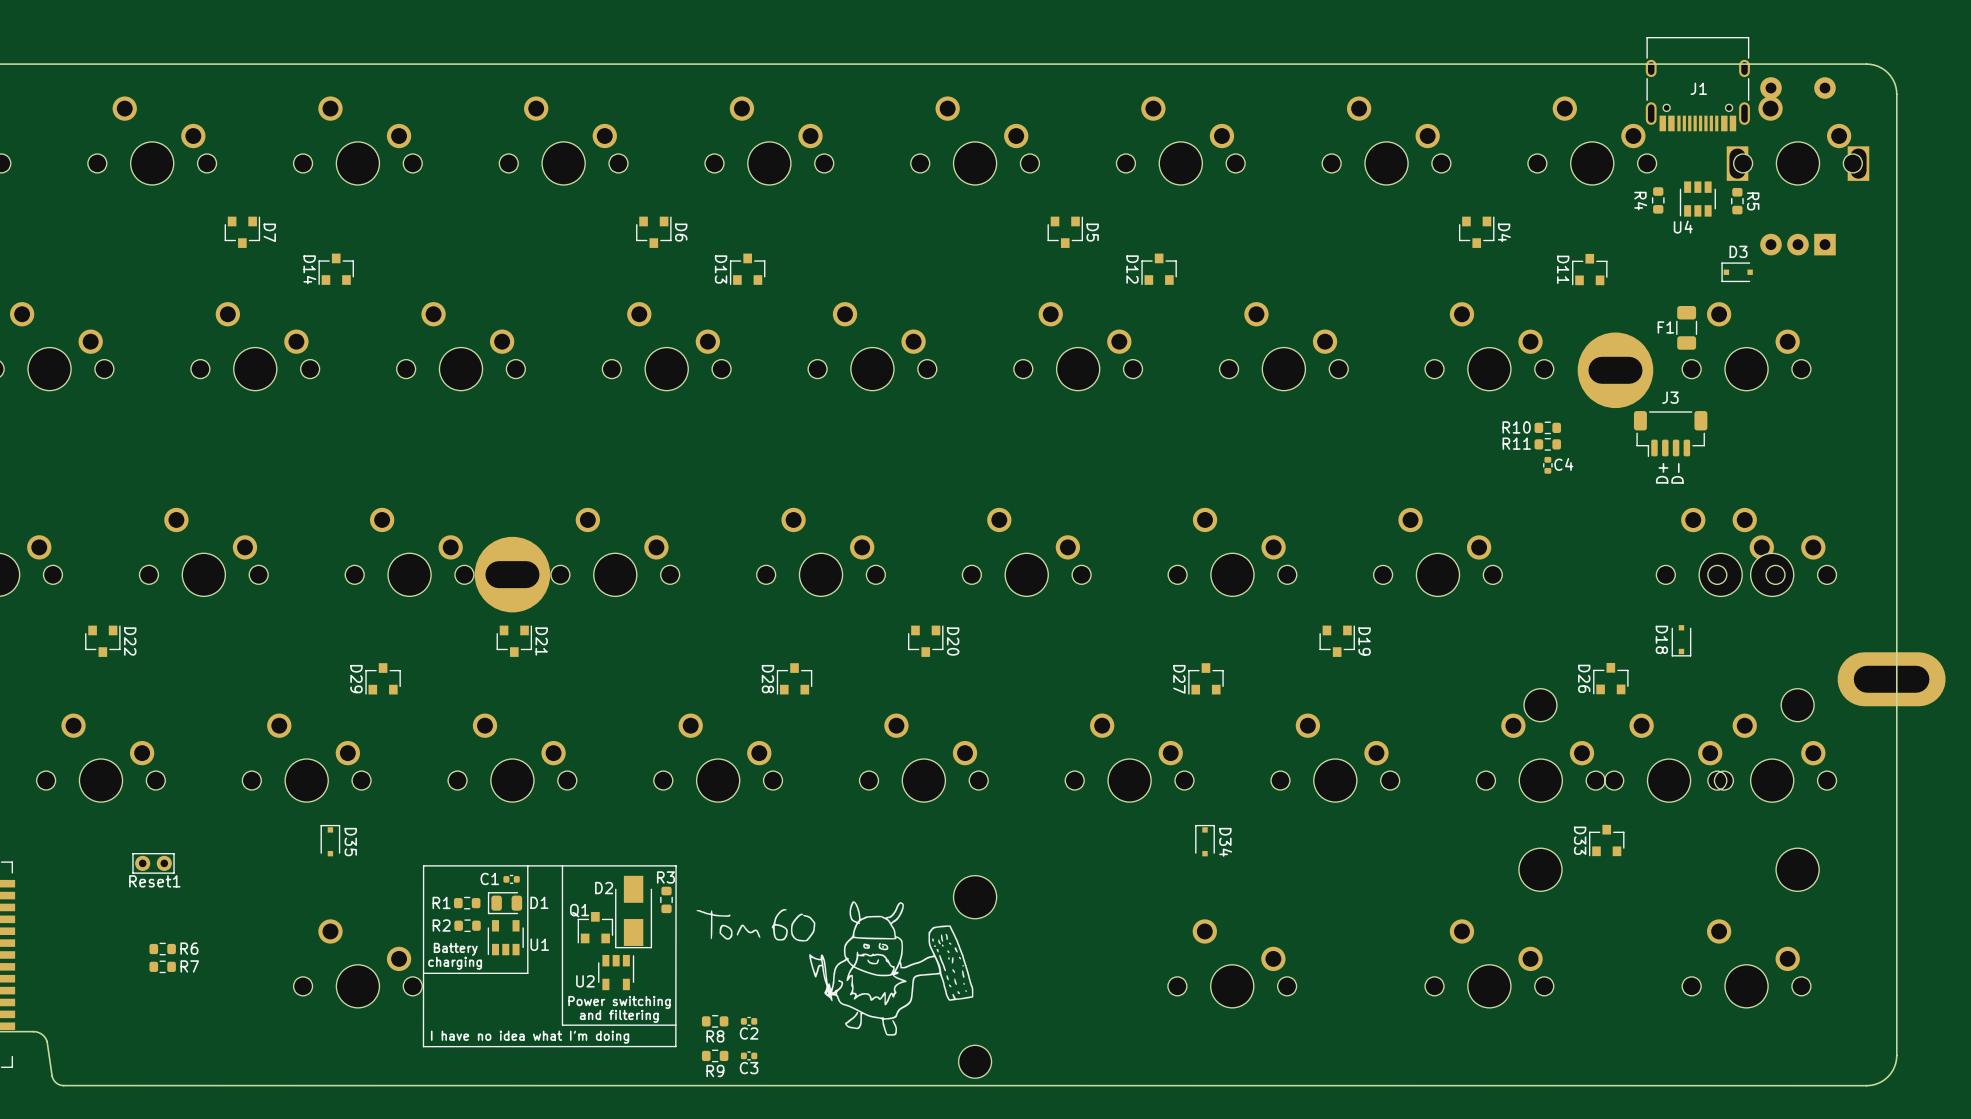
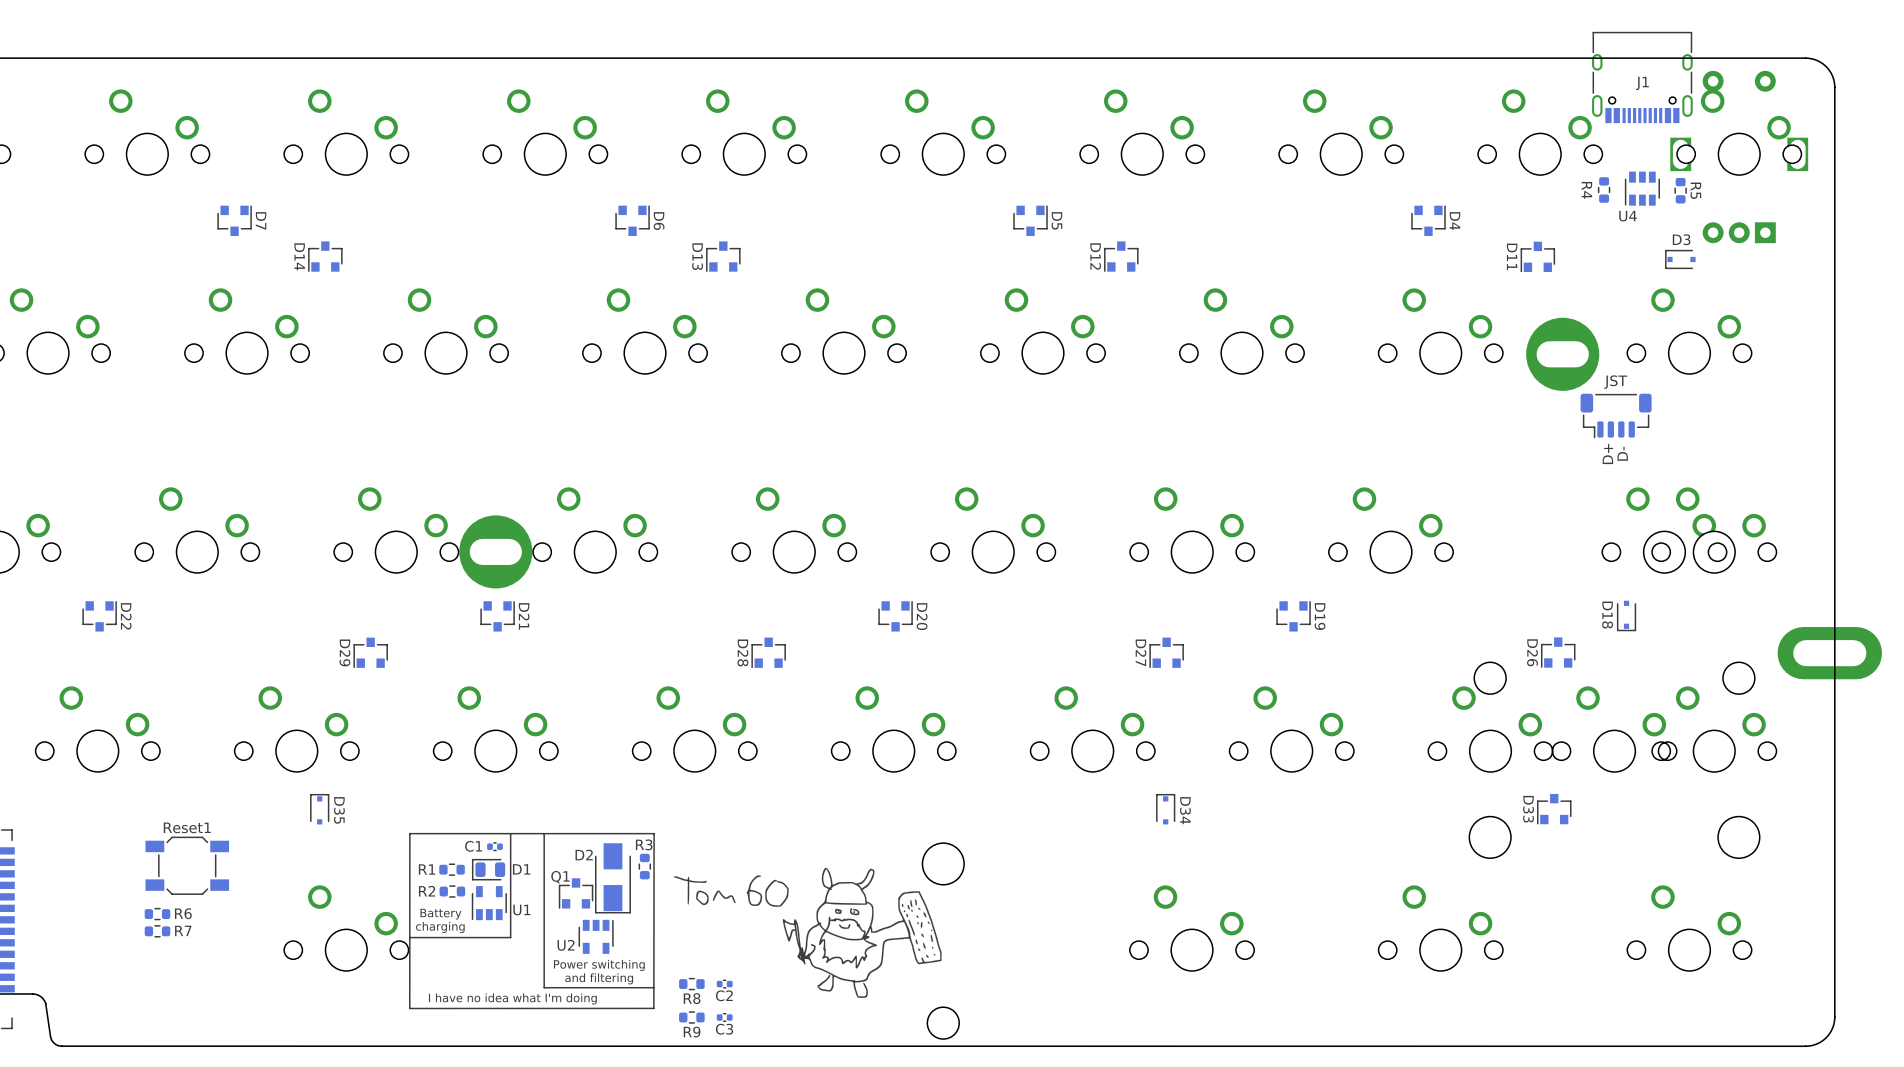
F1: (1686, 327) -> none
J3 name: J3 (1670, 397) -> JST (1615, 382)
R10: (1547, 427) -> none
R11: (1547, 444) -> none
C4: (1547, 465) -> none
Reset1 footprint: [132, 853, 175, 874] -> [145, 836, 230, 895]
Reset1 name position: Reset1 (154, 881) -> Reset1 (187, 827)

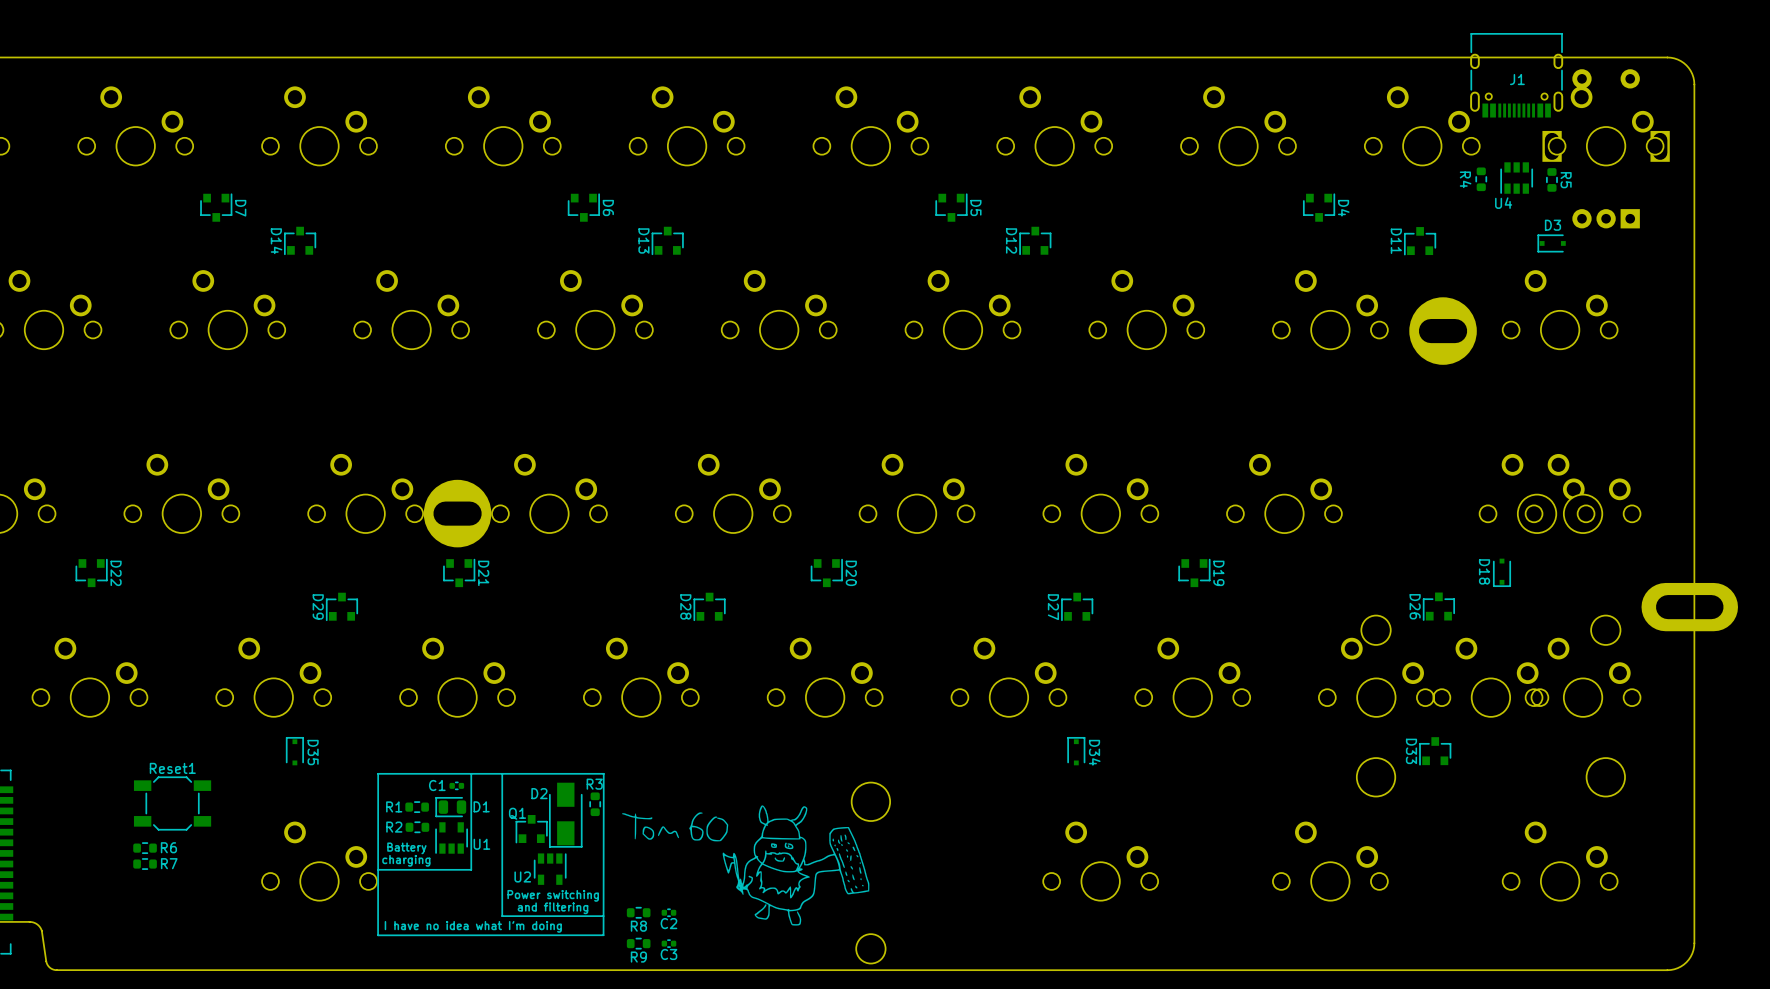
JST: (1616, 415) -> none
text: D- (1622, 453) -> none
text: D+ (1607, 454) -> none

